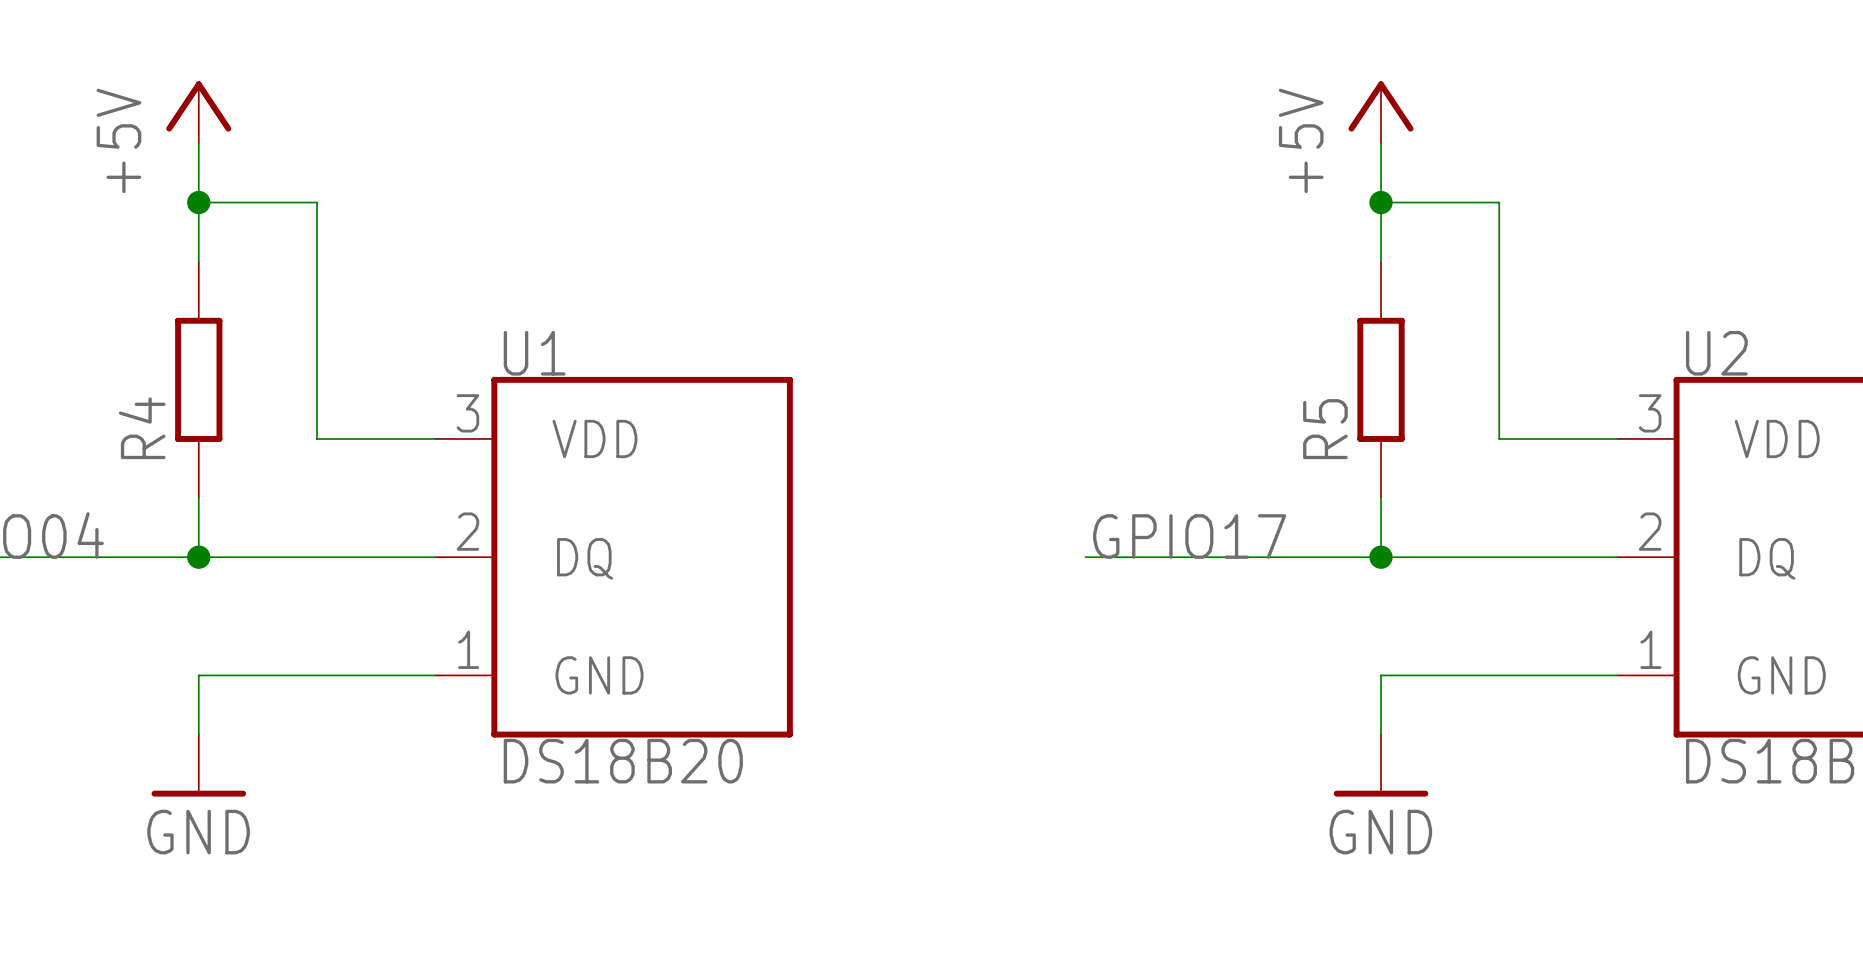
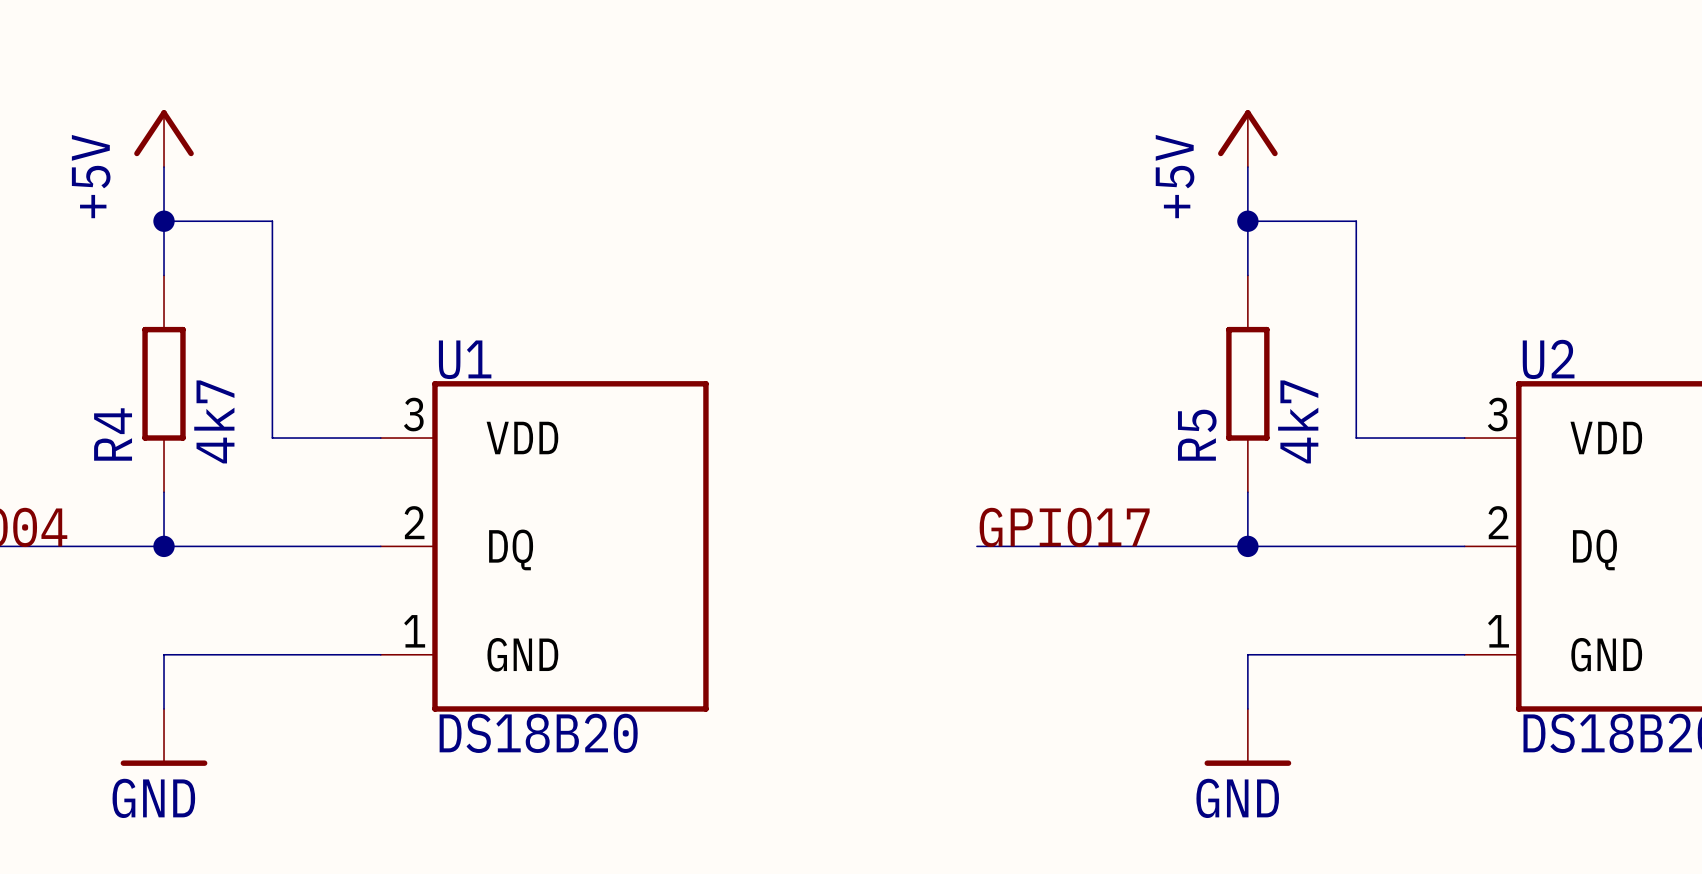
R4 value: none -> 4k7 (214, 421)
R5 value: none -> 4k7 (1298, 421)

